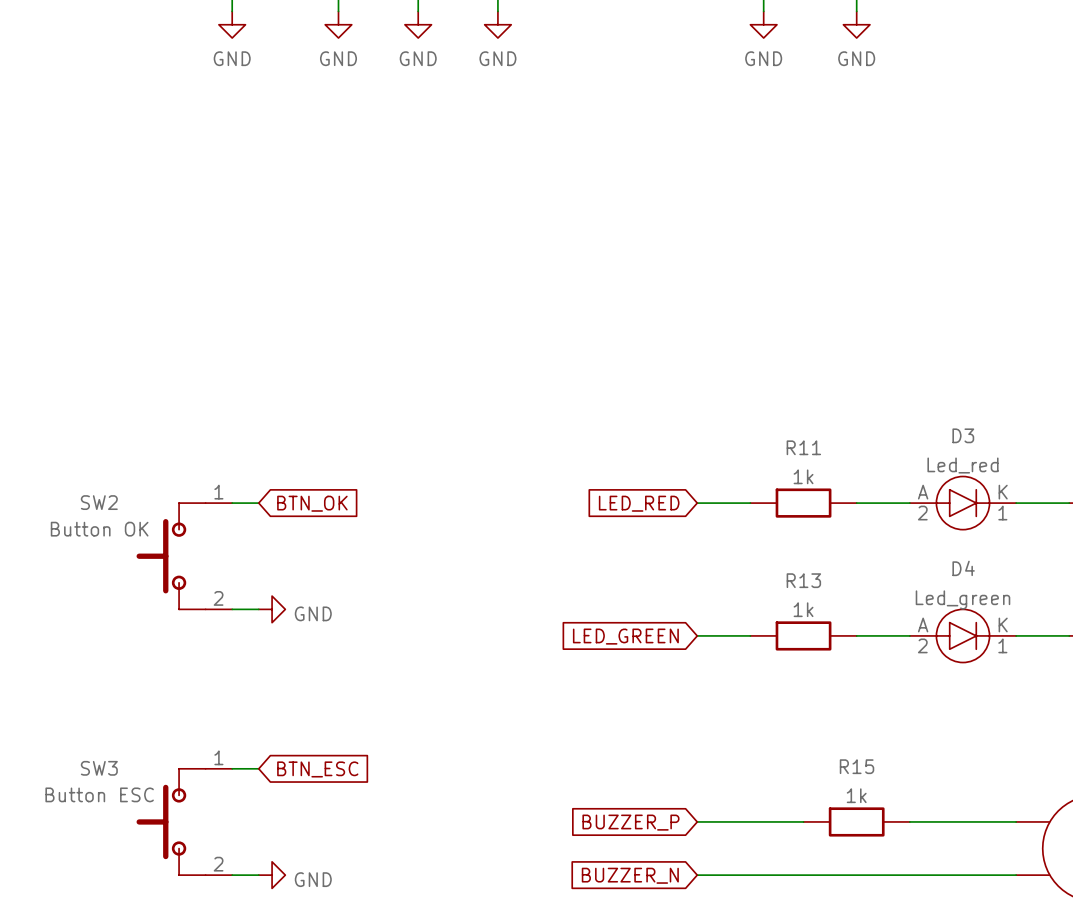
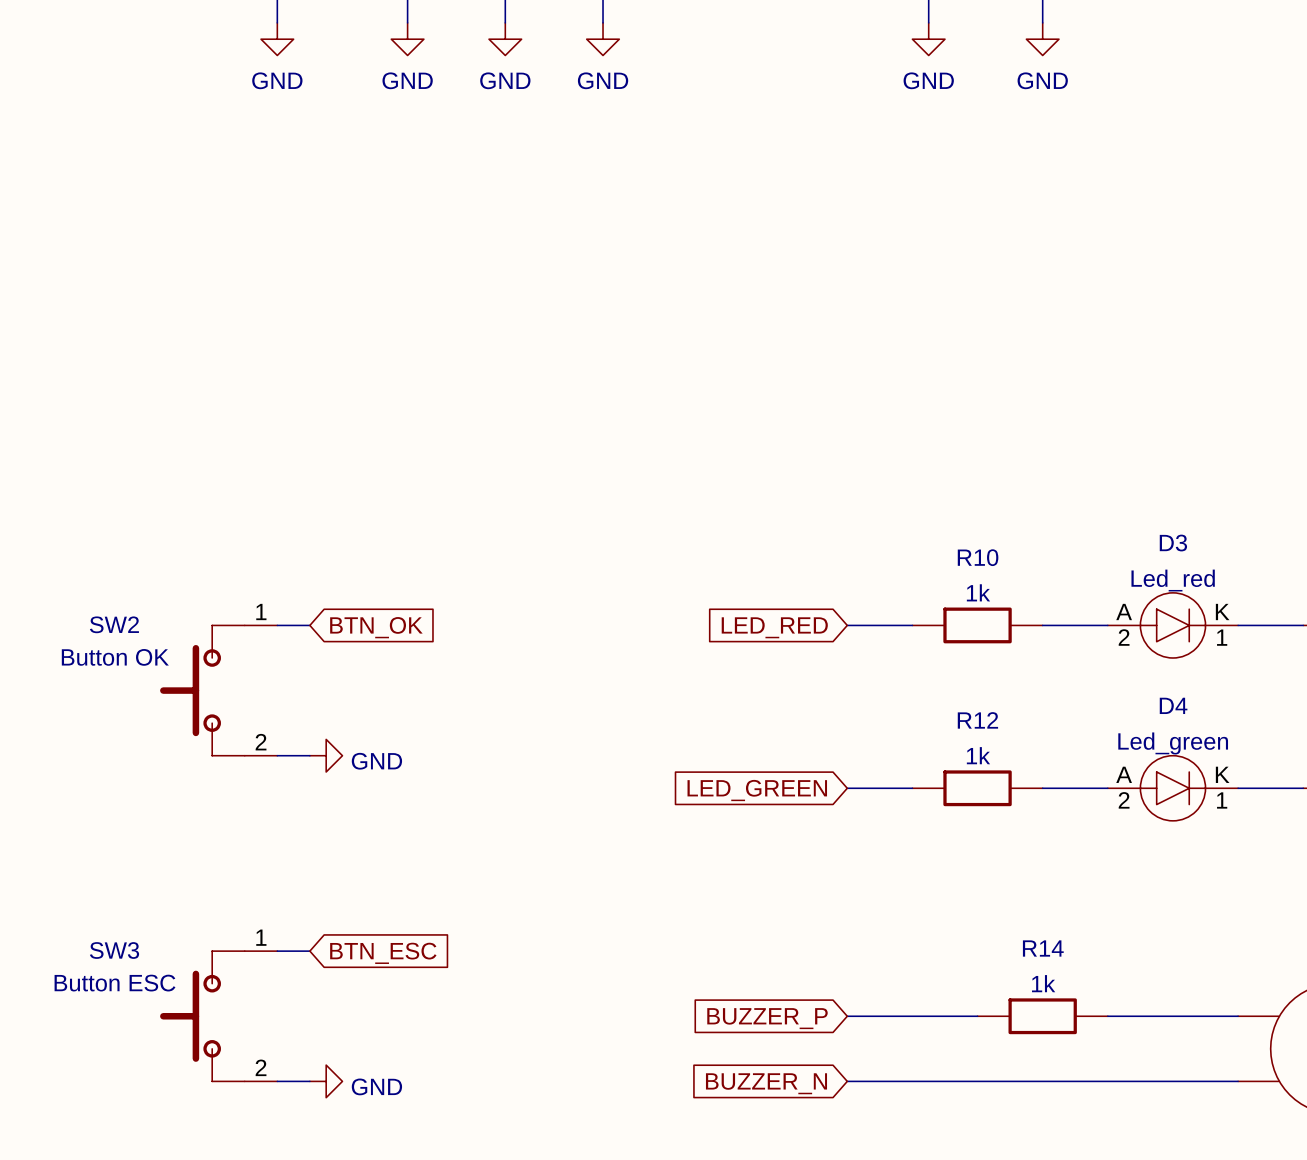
R11 name: R11 (803, 447) -> R10 (978, 557)
R13 name: R13 (803, 580) -> R12 (977, 720)
R15 name: R15 (857, 766) -> R14 (1043, 948)

